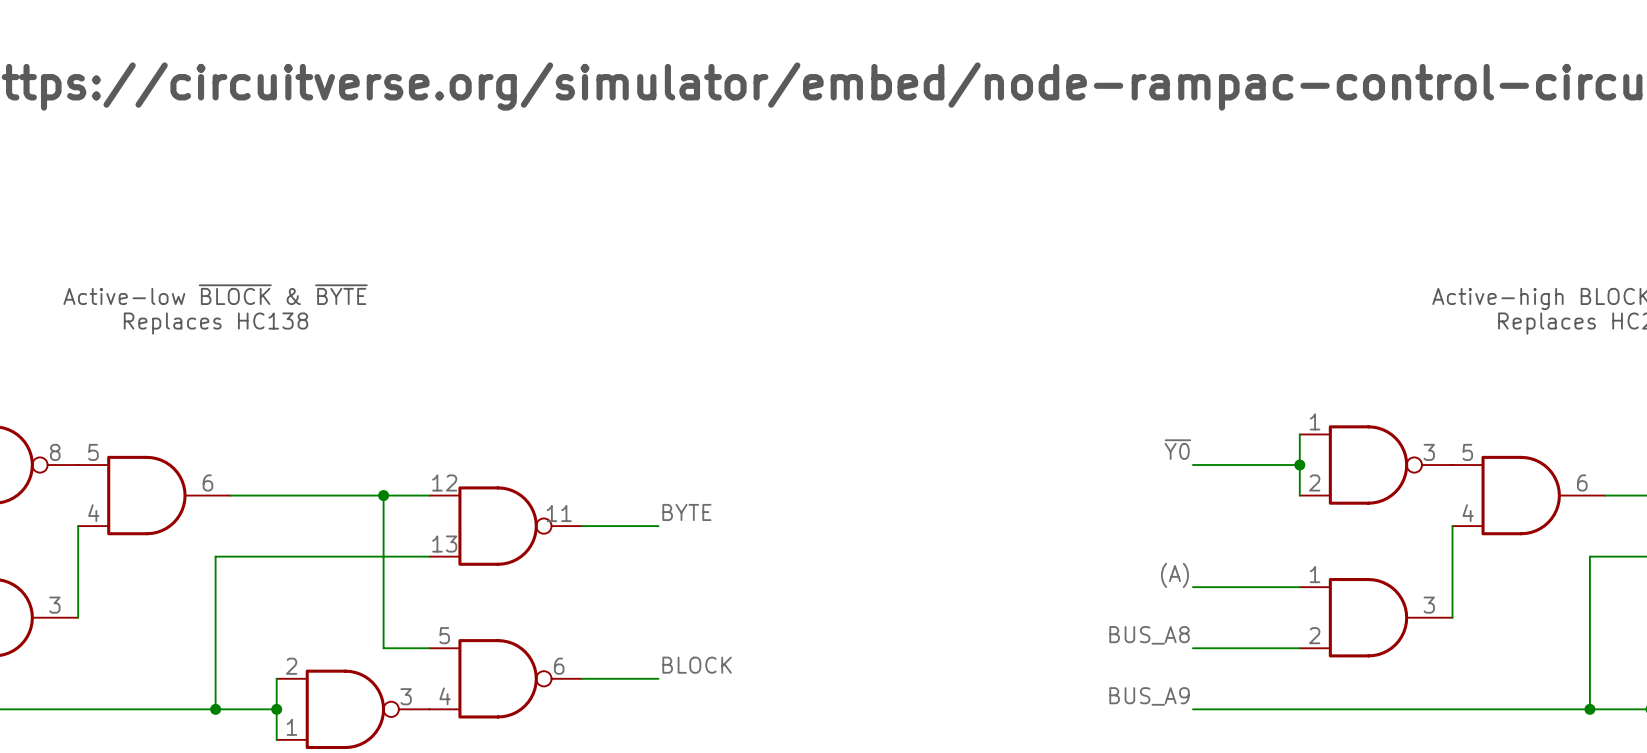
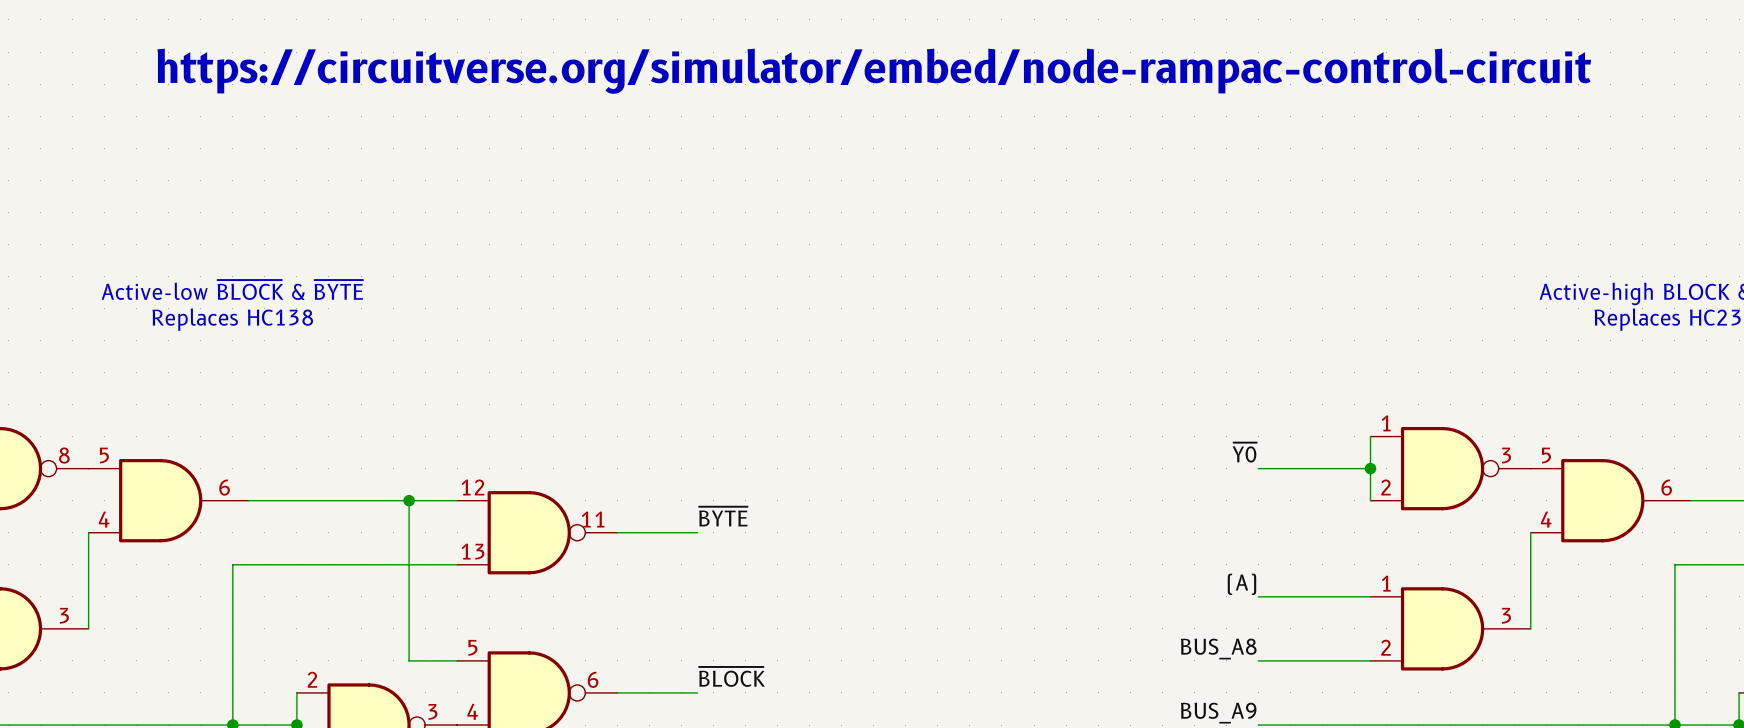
label: BYTE (686, 512) -> ~{BYTE} (723, 516)
label: BLOCK (697, 665) -> ~{BLOCK} (731, 676)

